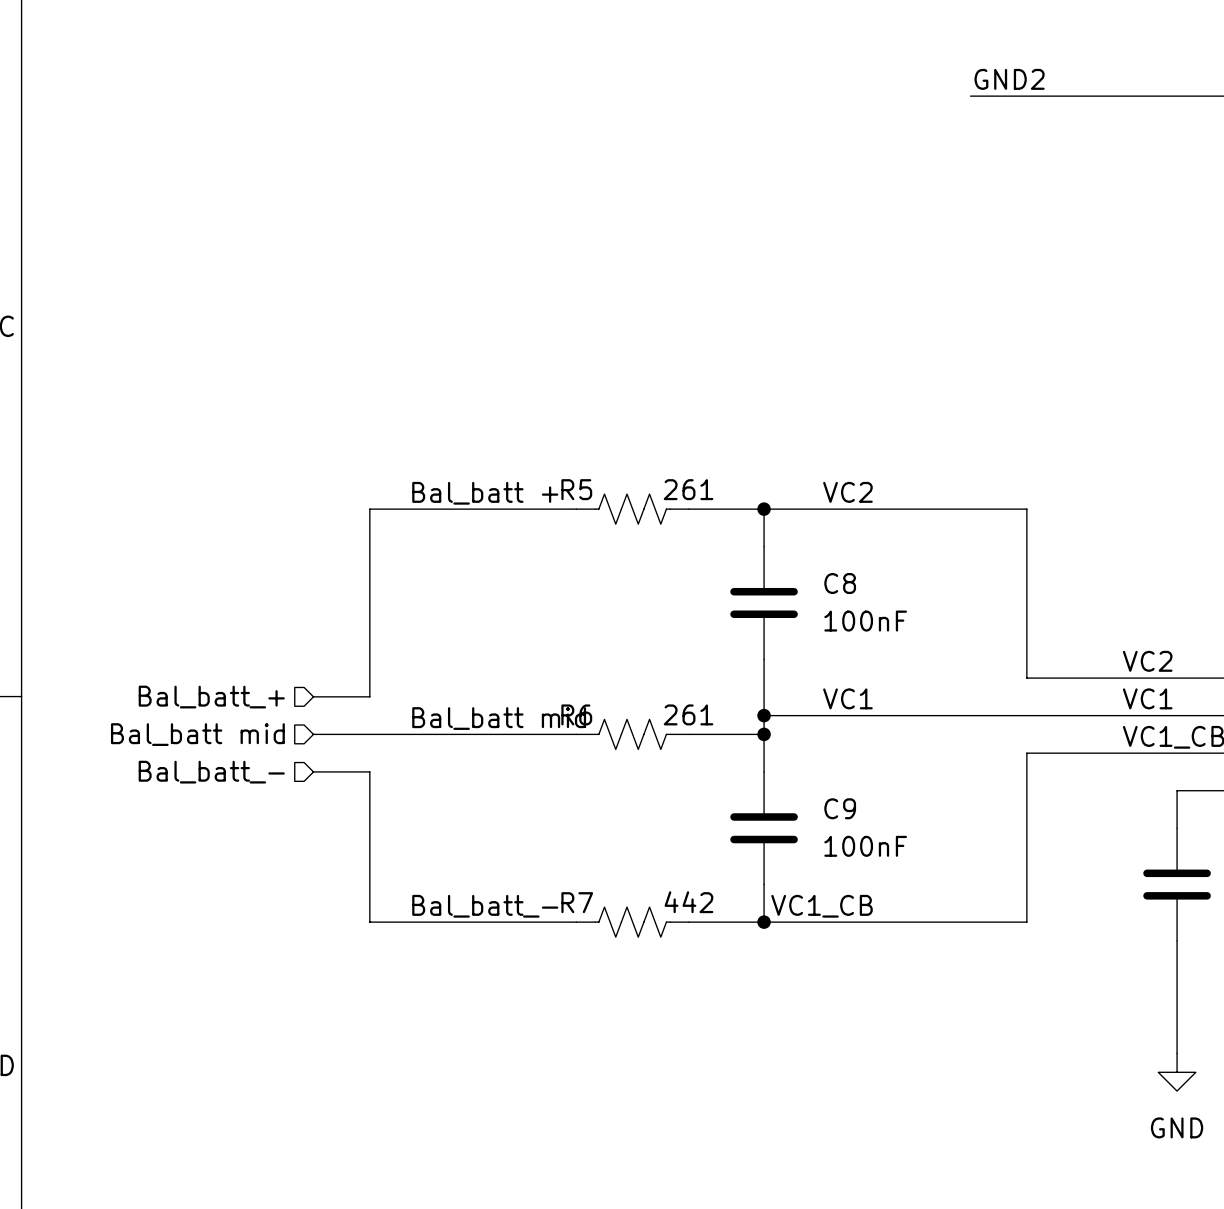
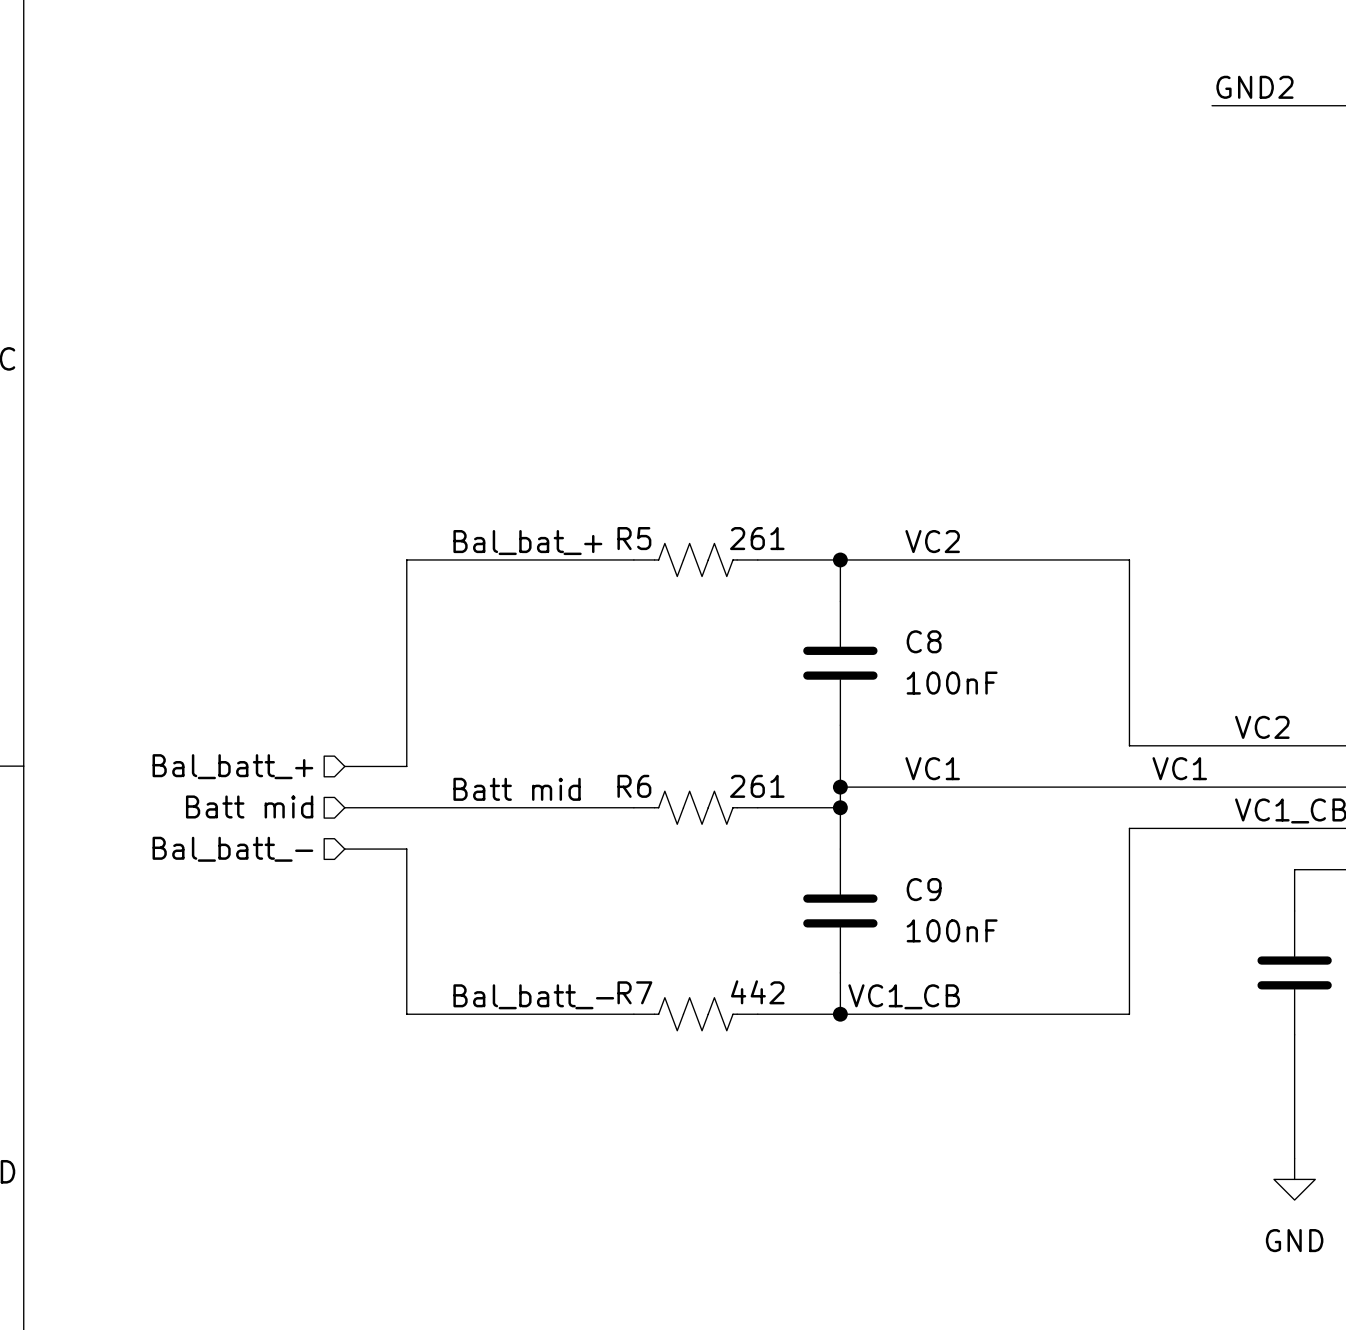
label position: GND2 (1009, 79) -> GND2 (1254, 87)
wire: (970, 96) (1101, 96) -> none
label: Bal_batt + (485, 493) -> Bal_bat_+ (527, 542)
label position: VC1 (1147, 698) -> VC1 (1179, 768)
label: Bal_batt mid (499, 718) -> Batt mid (517, 789)
hierarchical label: Bal_batt mid (197, 734) -> Batt mid (249, 806)

